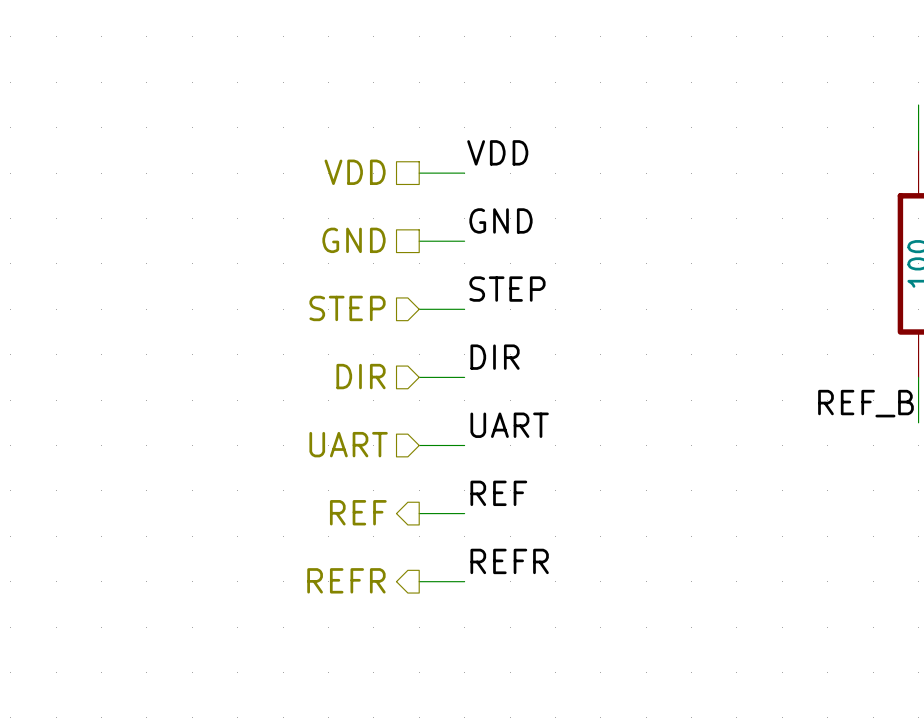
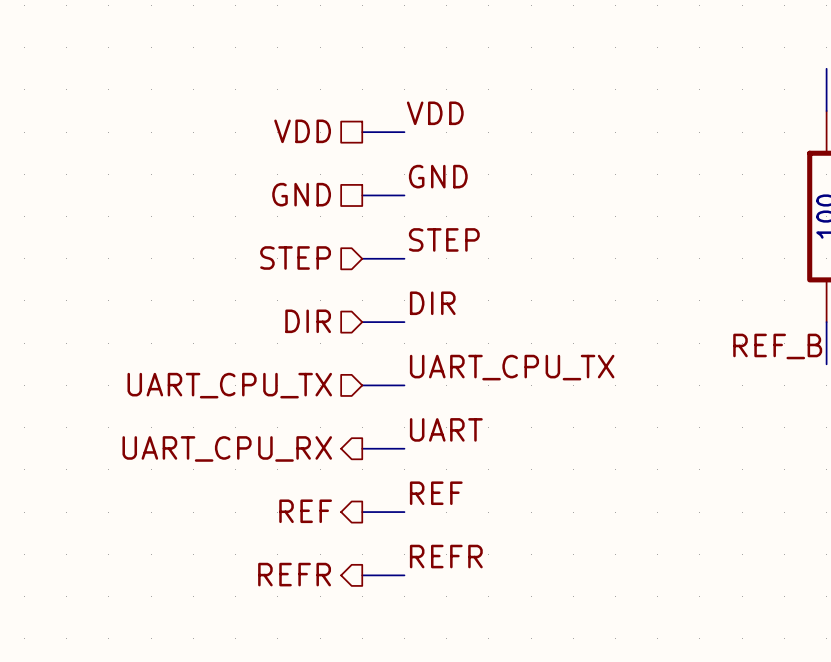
label: UART (509, 425) -> UART_CPU_TX (512, 367)
hierarchical label: UART (348, 444) -> UART_CPU_TX (229, 385)
label: REF (498, 493) -> UART (446, 429)
hierarchical label: REF (358, 512) -> UART_CPU_RX (227, 448)
label: REFR (509, 561) -> REF (436, 493)
hierarchical label: REFR (346, 580) -> REF (305, 511)
label: none -> REFR (446, 556)
hierarchical label: none -> REFR (294, 574)
wire: none -> (362, 575) (404, 575)

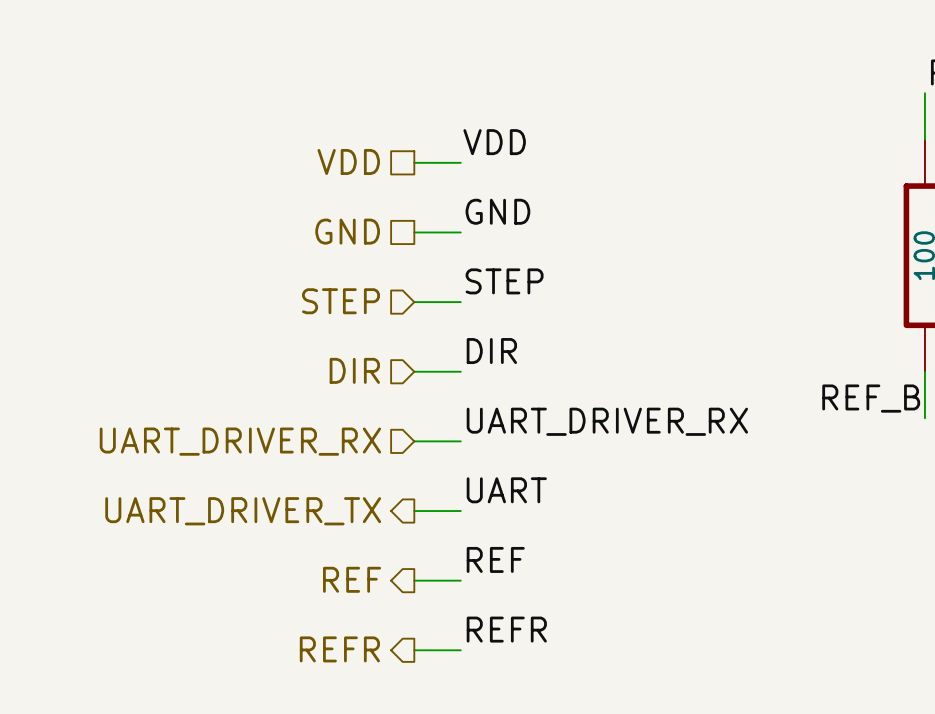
label: UART_CPU_TX (512, 367) -> UART_DRIVER_RX (607, 421)
hierarchical label: UART_CPU_TX (229, 385) -> UART_DRIVER_RX (240, 441)
hierarchical label: UART_CPU_RX (227, 448) -> UART_DRIVER_TX (243, 511)

